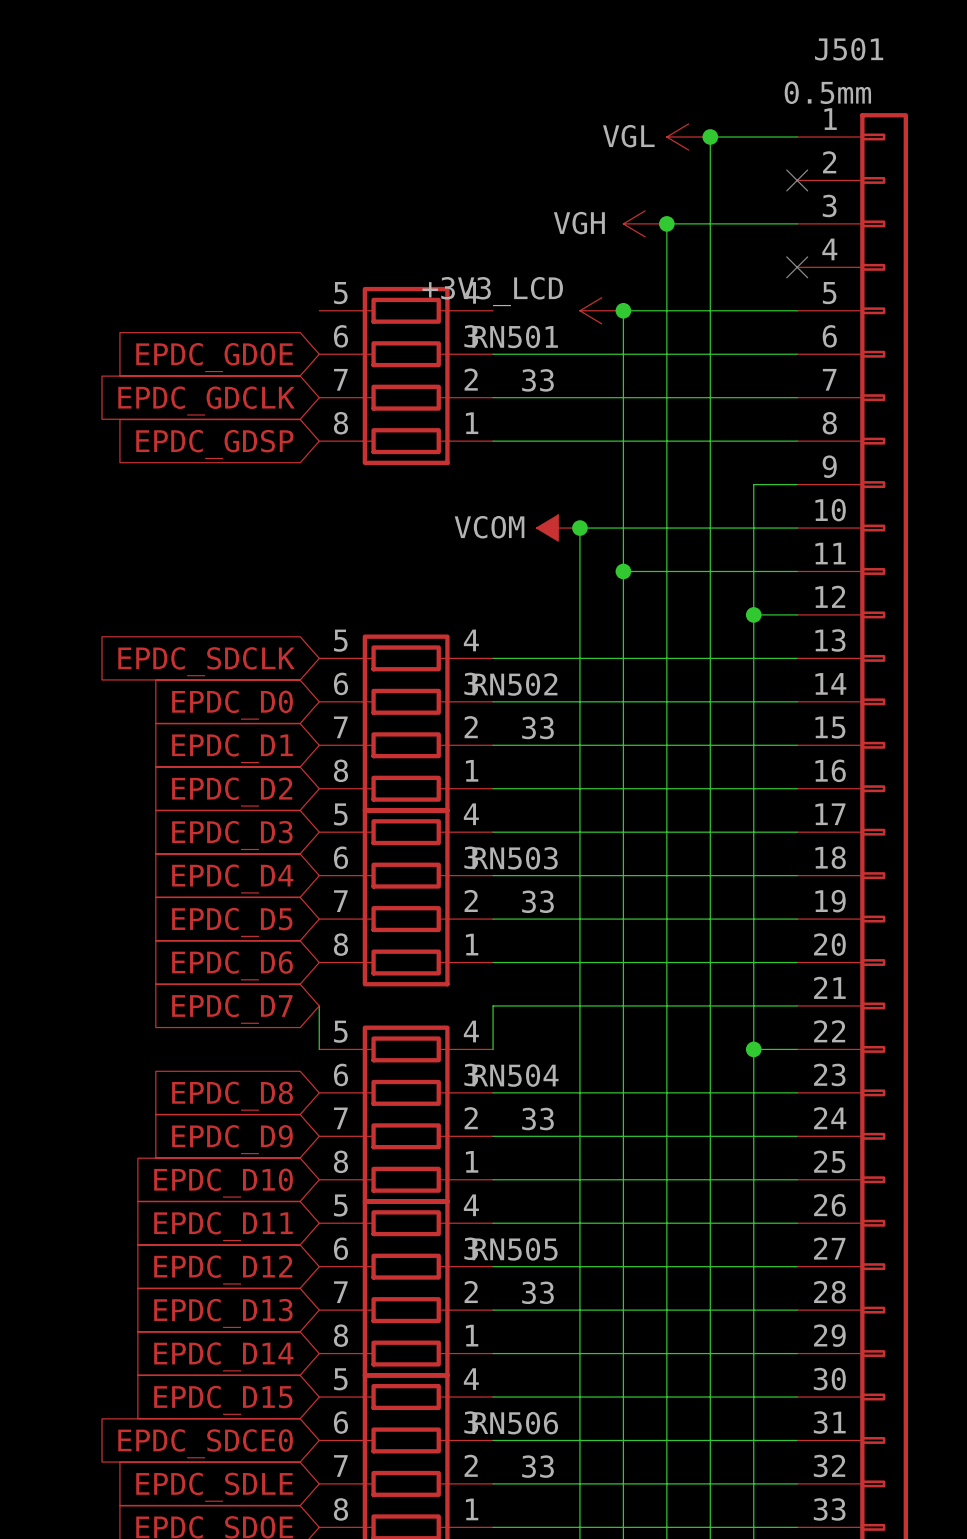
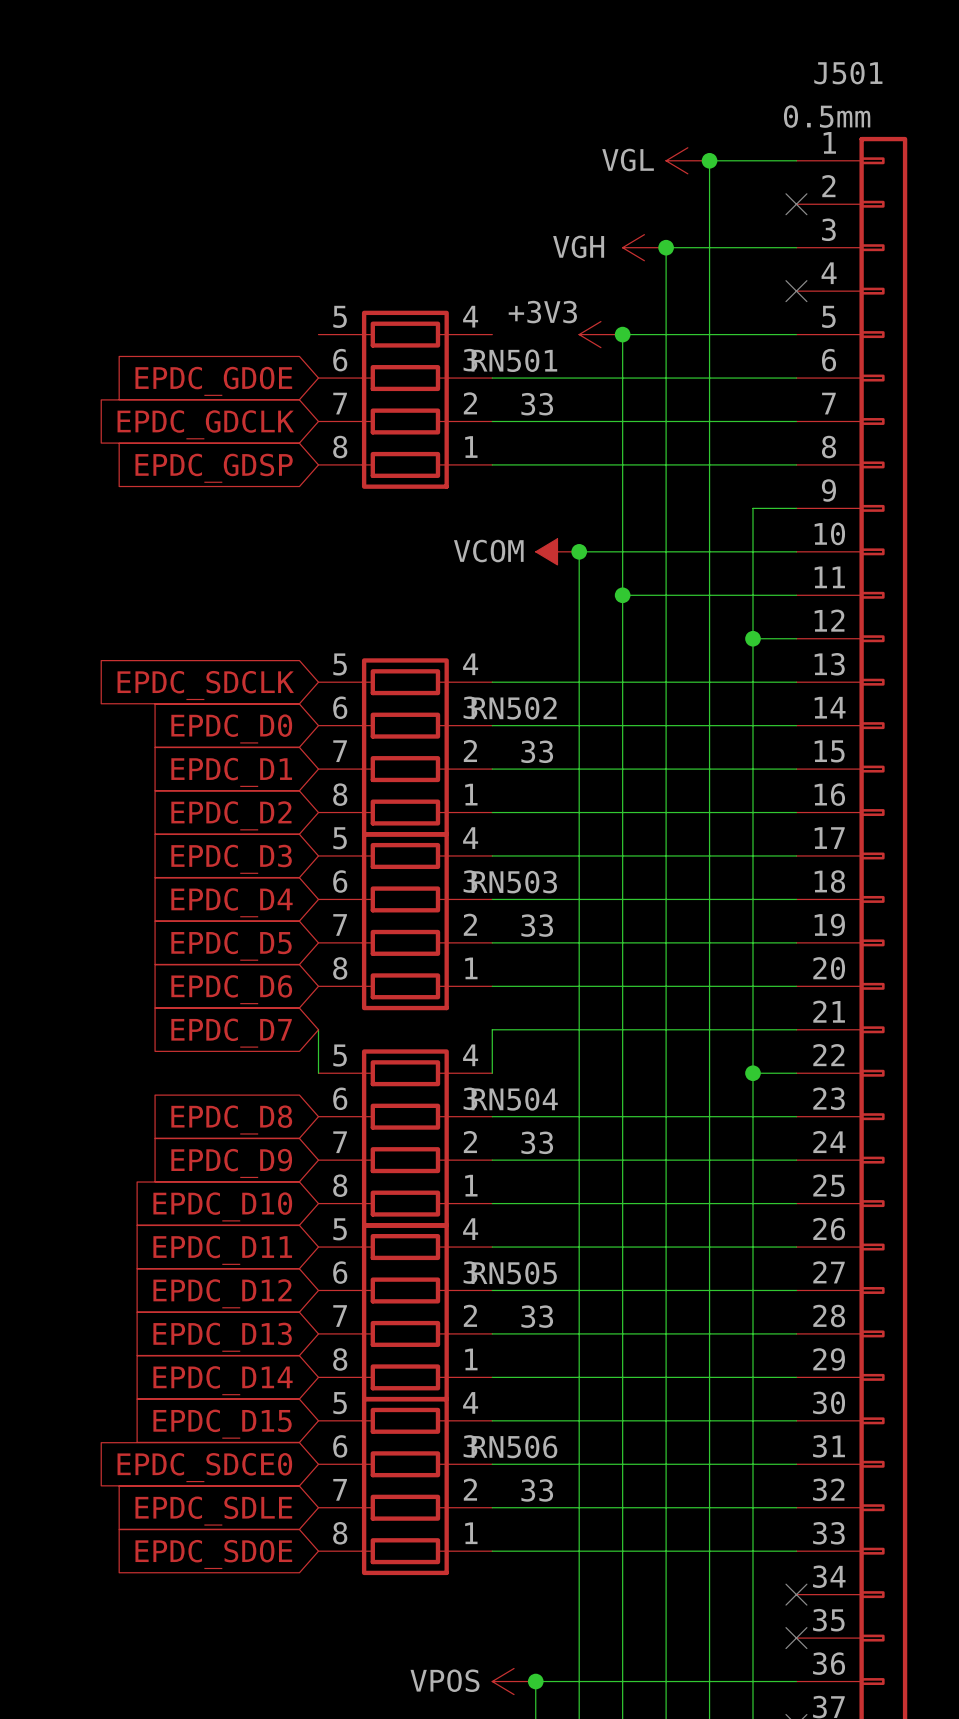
power symbol: +3V3_LCD (601, 310) -> +3V3 (600, 334)

